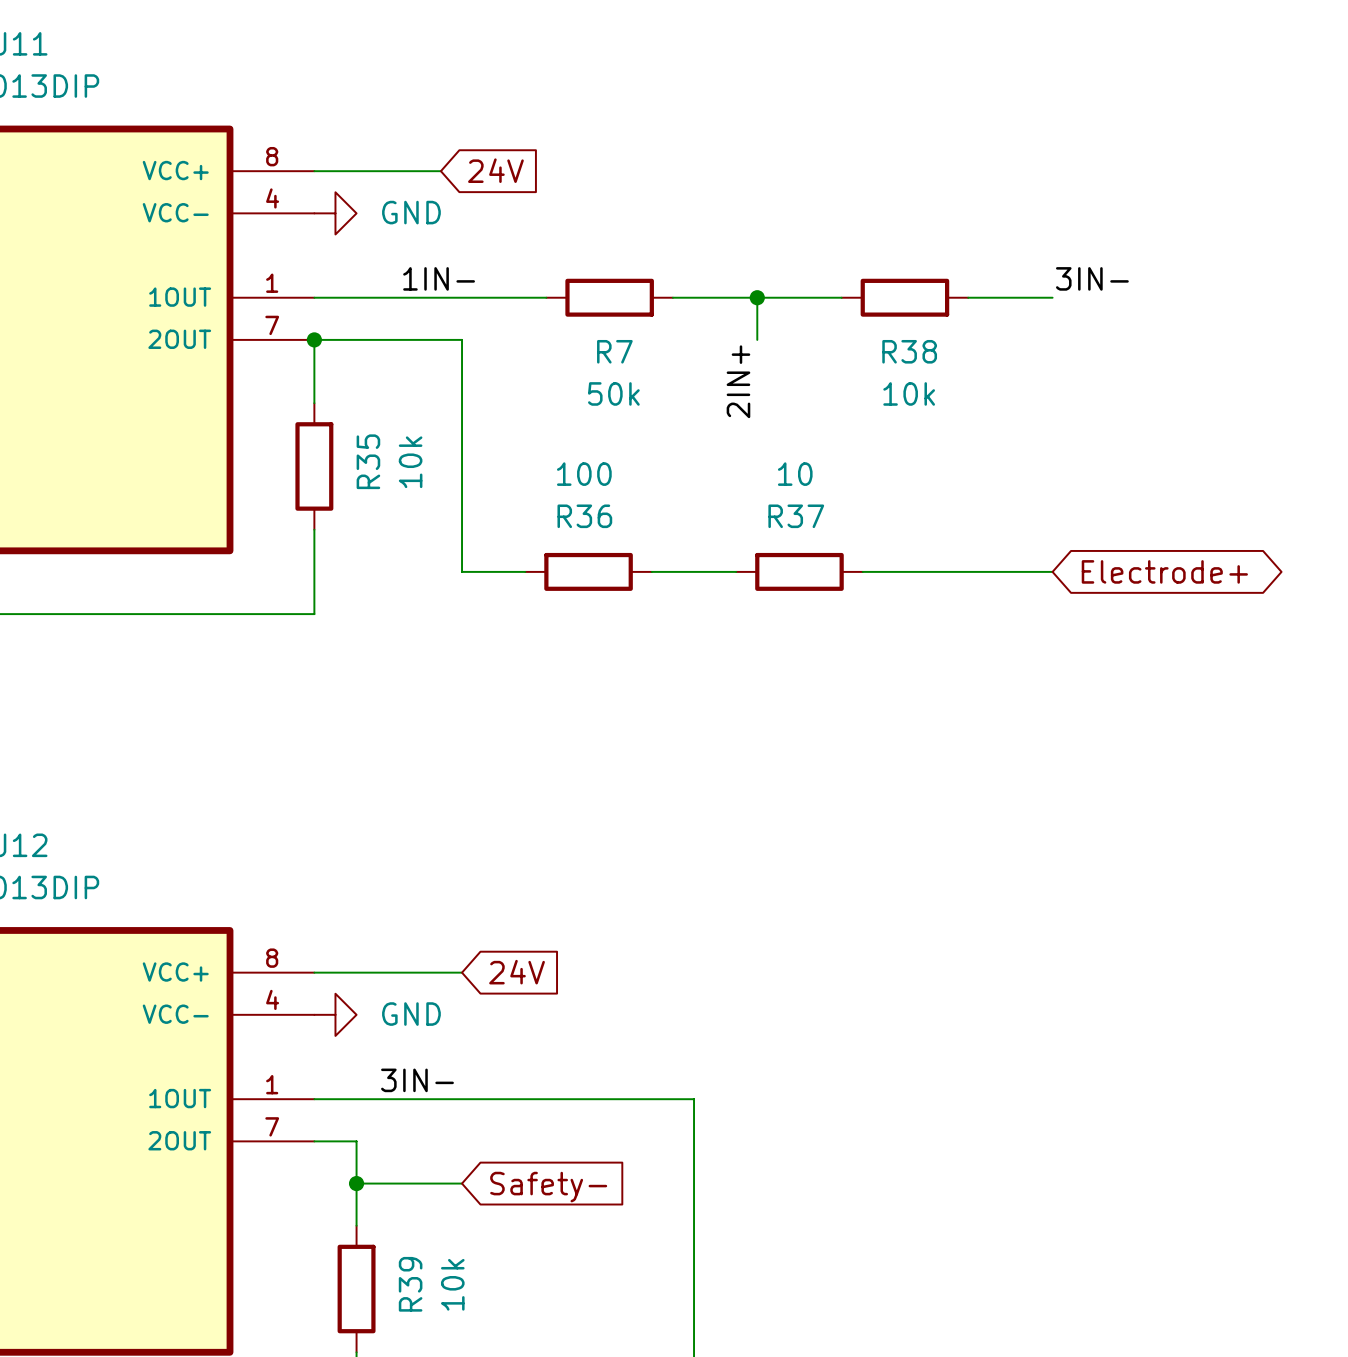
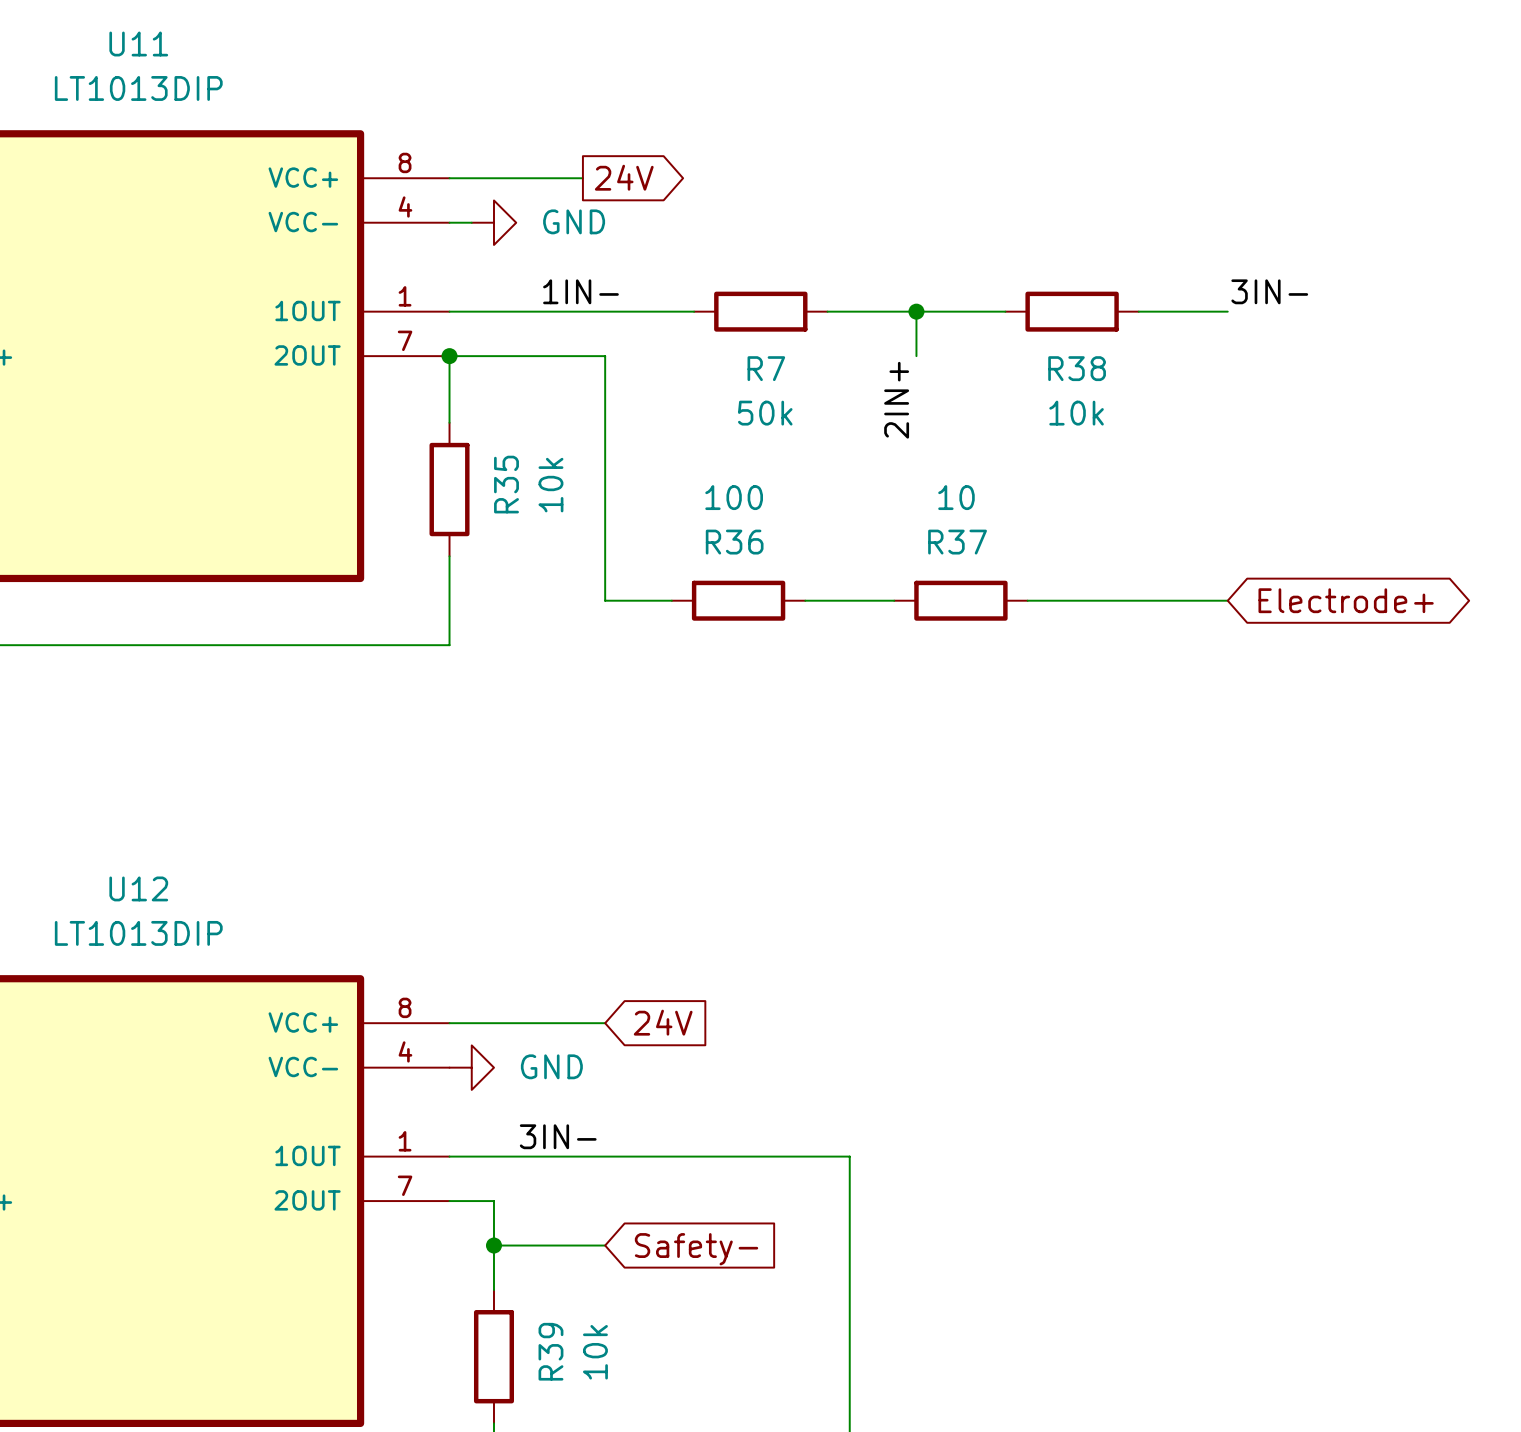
global label shape: input (495, 170) -> output (624, 177)
power symbol position: GND (335, 213) -> GND (493, 222)

